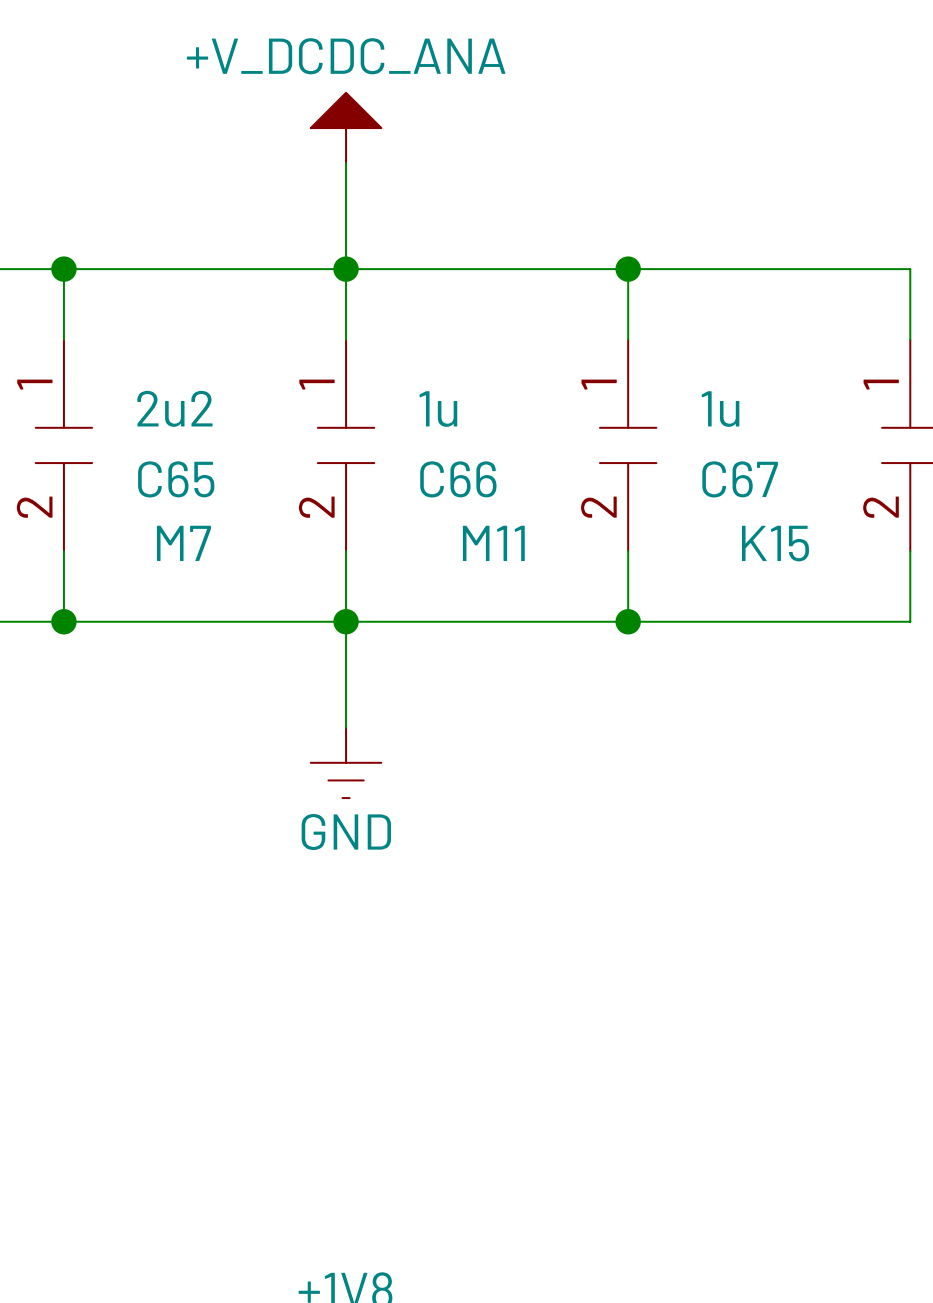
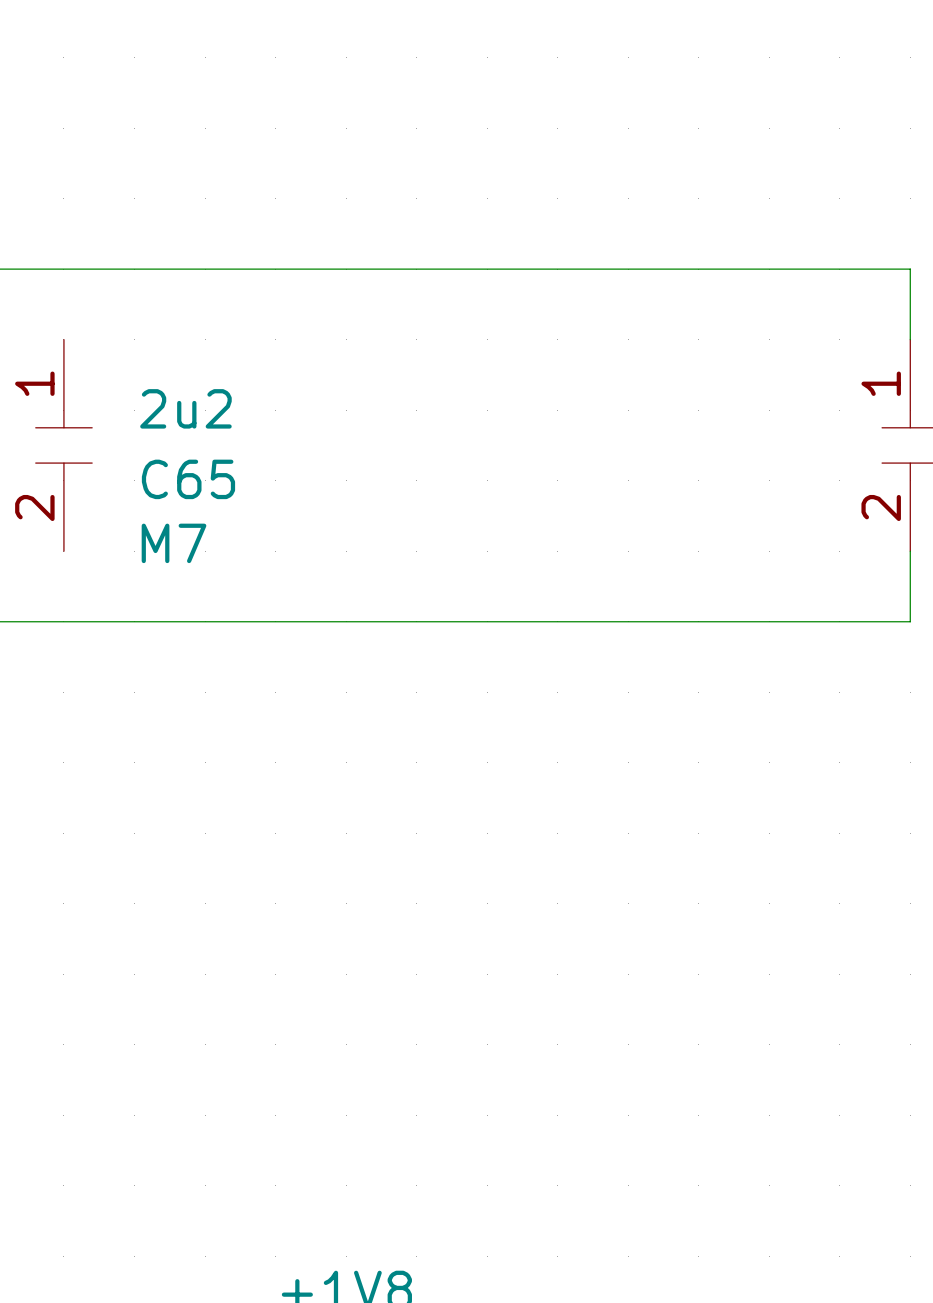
power symbol: +V_DCDC_ANA (346, 128) -> none
wire: (346, 163) (346, 339) -> none
wire: (63, 269) (63, 339) -> none
junction: (63, 269) -> none
junction: (346, 269) -> none
wire: (628, 269) (628, 339) -> none
junction: (628, 269) -> none
C66: 1u (346, 445) -> none
C67: 1u (628, 445) -> none
wire: (63, 551) (63, 621) -> none
wire: (346, 551) (346, 727) -> none
wire: (628, 551) (628, 621) -> none
junction: (63, 621) -> none
junction: (346, 621) -> none
junction: (628, 621) -> none
power symbol: GND (346, 762) -> none

